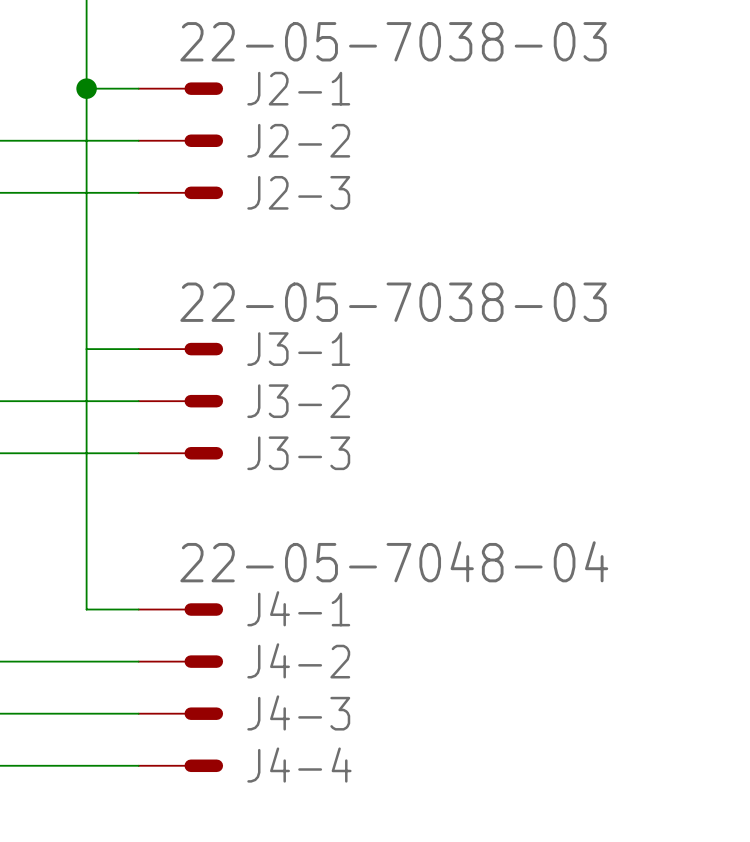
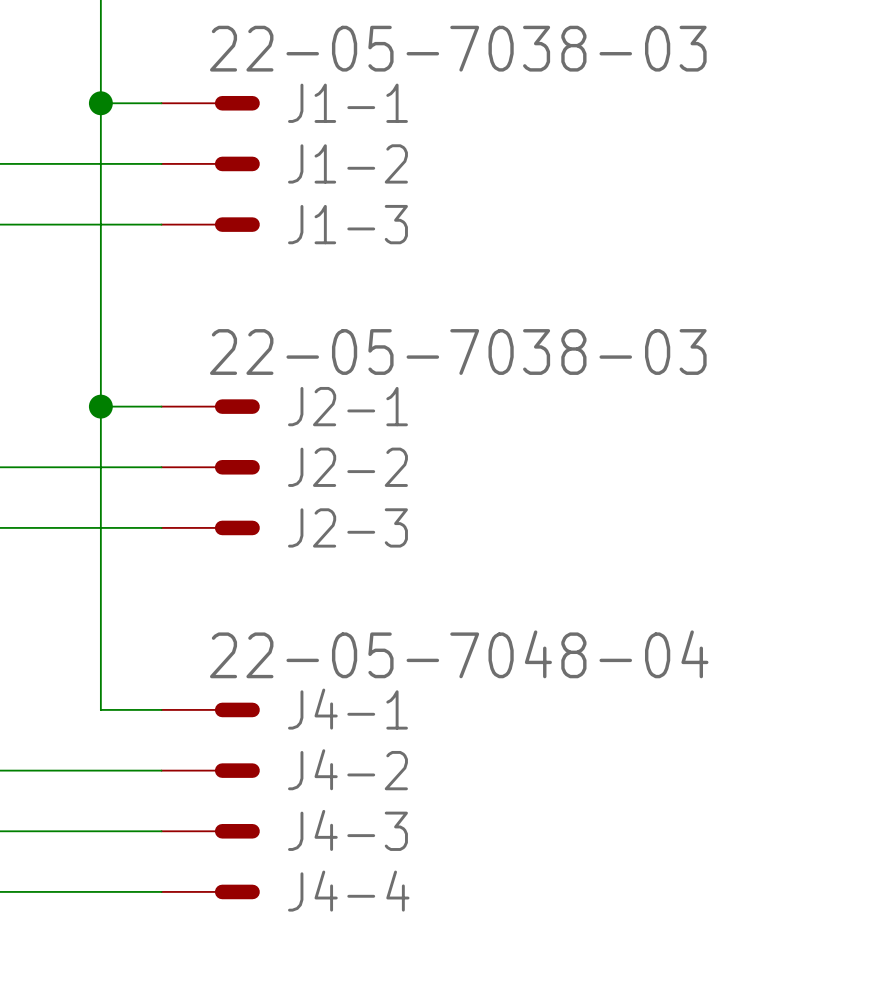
J2-1 name: J2-1 (298, 88) -> J1-1 (347, 103)
J2-2 name: J2-2 (298, 140) -> J1-2 (347, 163)
J2-3 name: J2-3 (298, 192) -> J1-3 (347, 224)
junction: none -> (100, 406)
J3-1 name: J3-1 (298, 349) -> J2-1 (347, 406)
J3-2 name: J3-2 (298, 401) -> J2-2 (347, 467)
J3-3 name: J3-3 (298, 453) -> J2-3 (347, 527)

